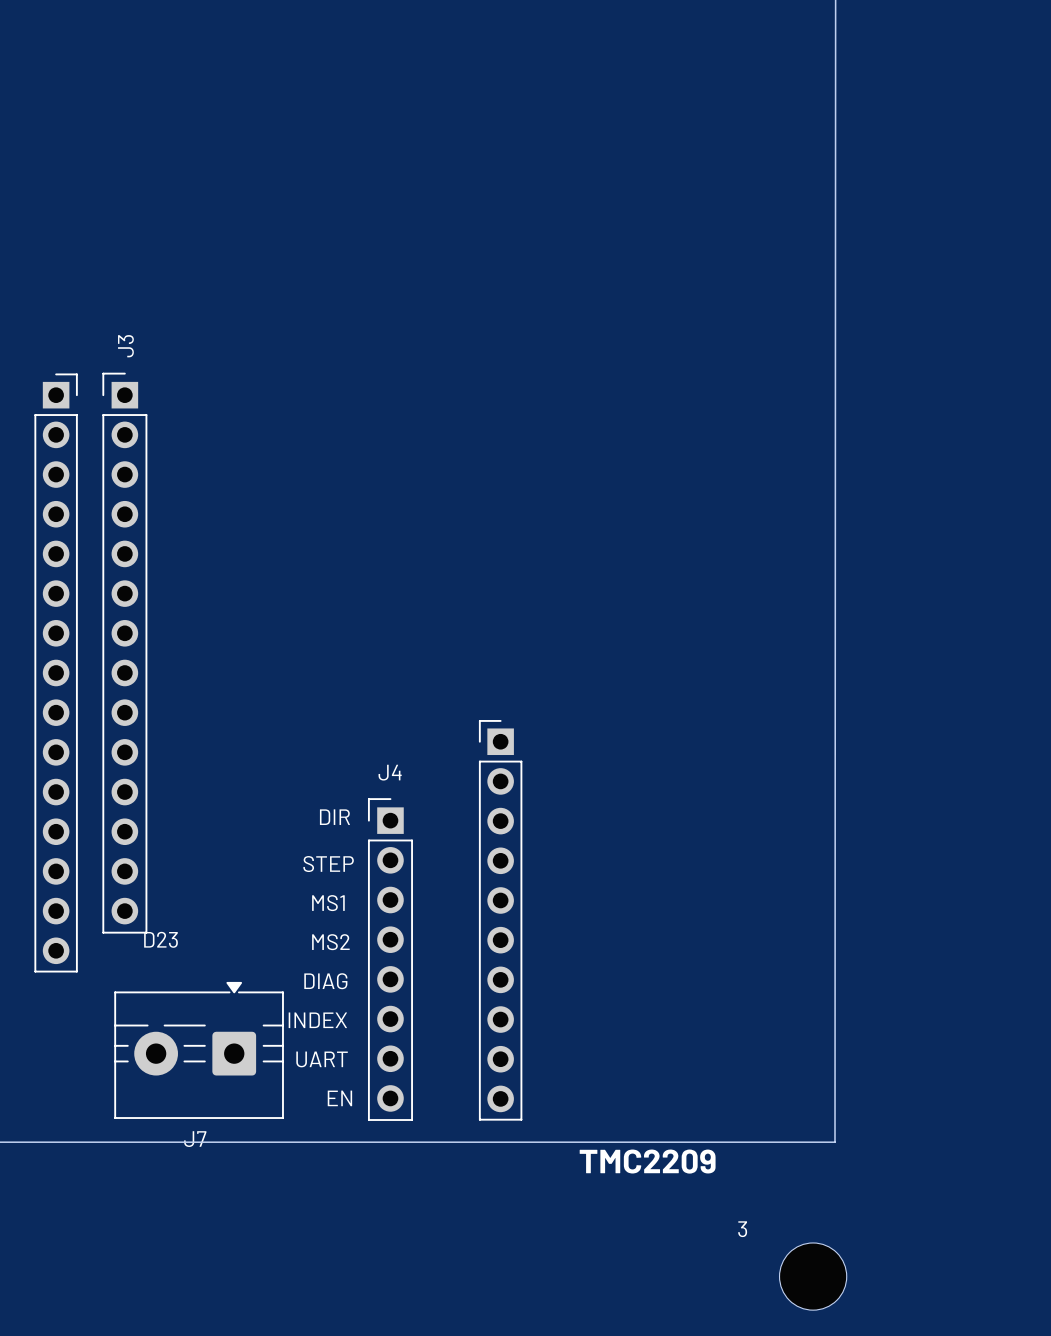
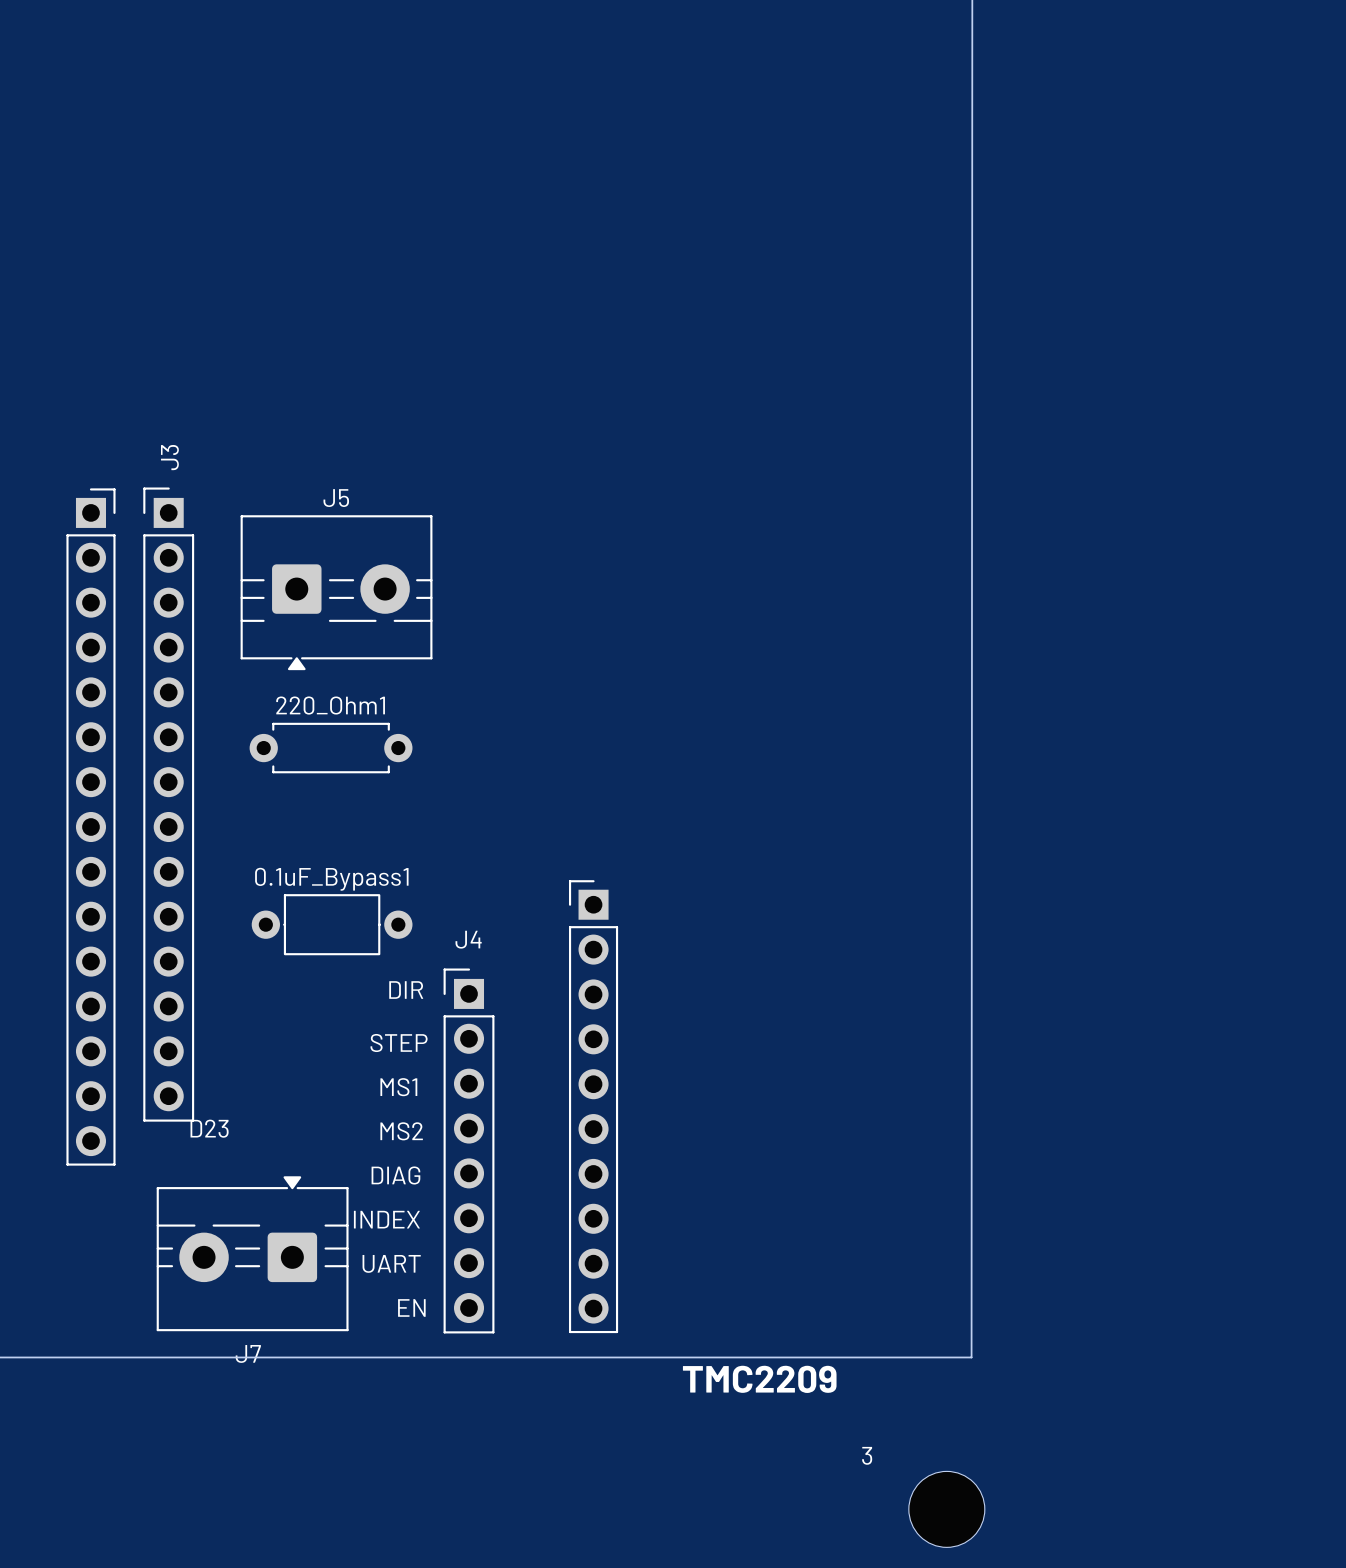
J5: none -> (336, 592)
220_Ohm1: none -> (331, 748)
0.1uF_Bypass1: none -> (332, 924)

